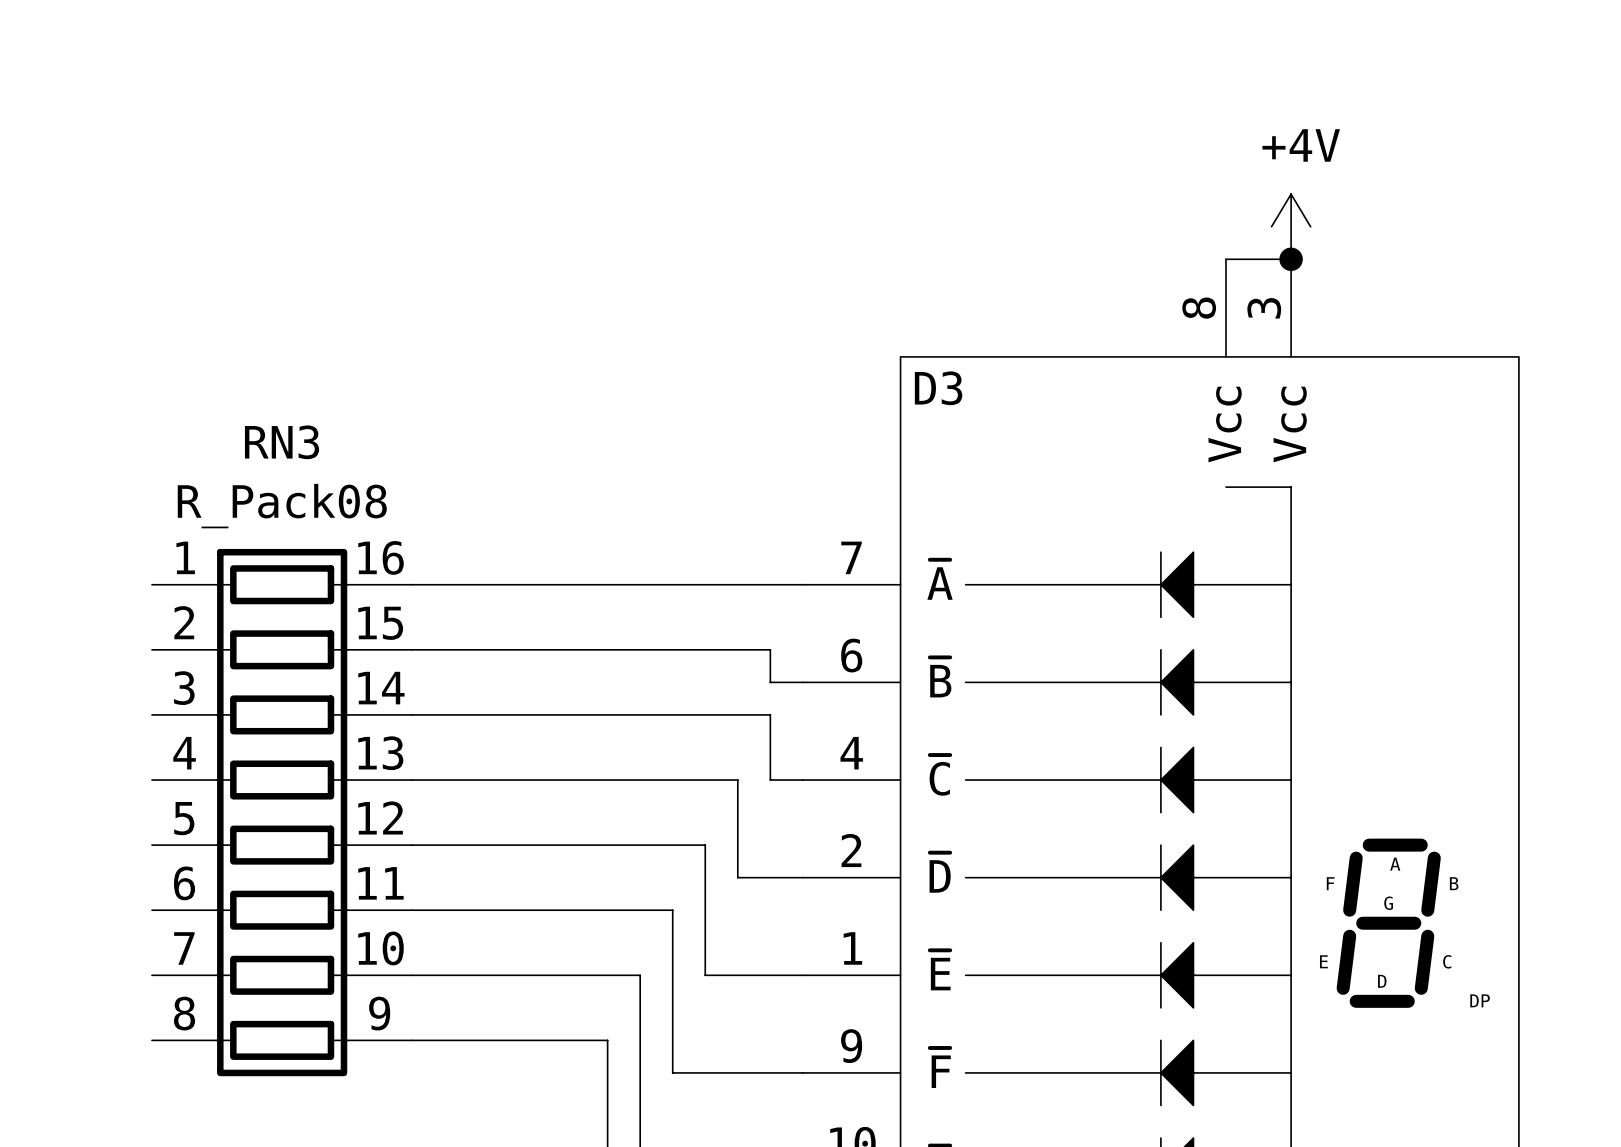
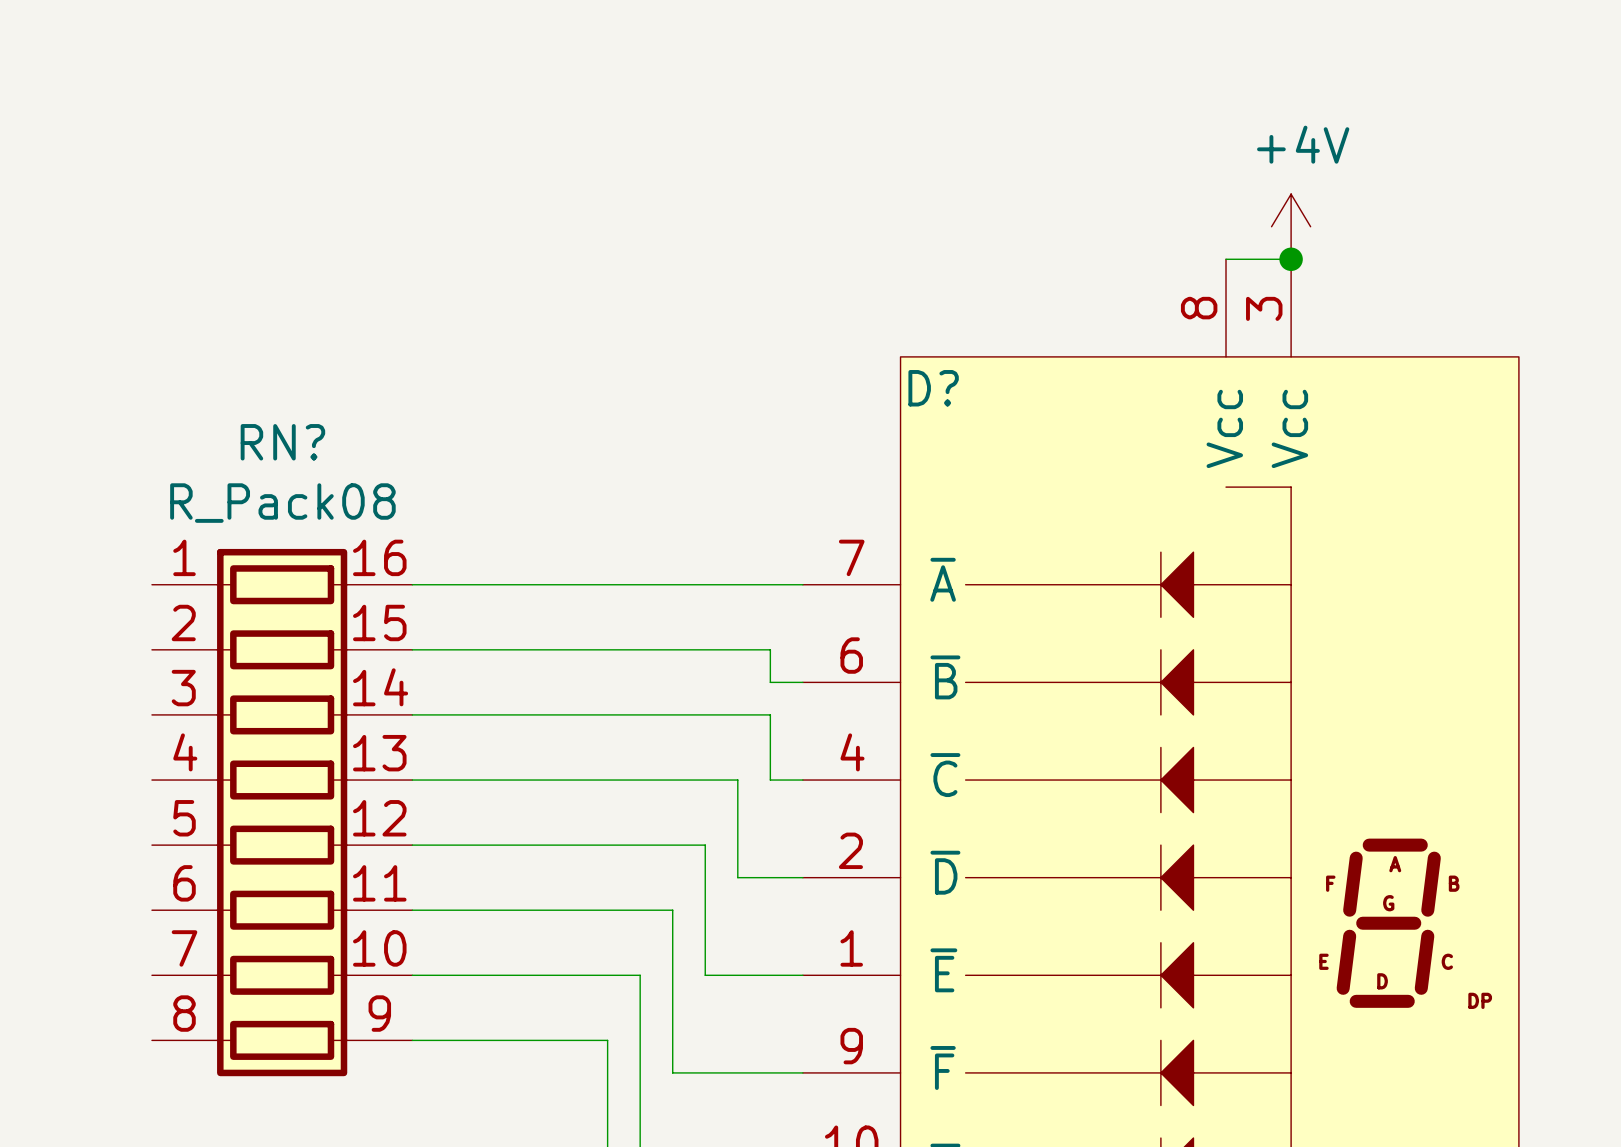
D3 name: D3 (938, 388) -> D? (933, 388)
RN3 name: RN3 (282, 442) -> RN? (282, 442)

